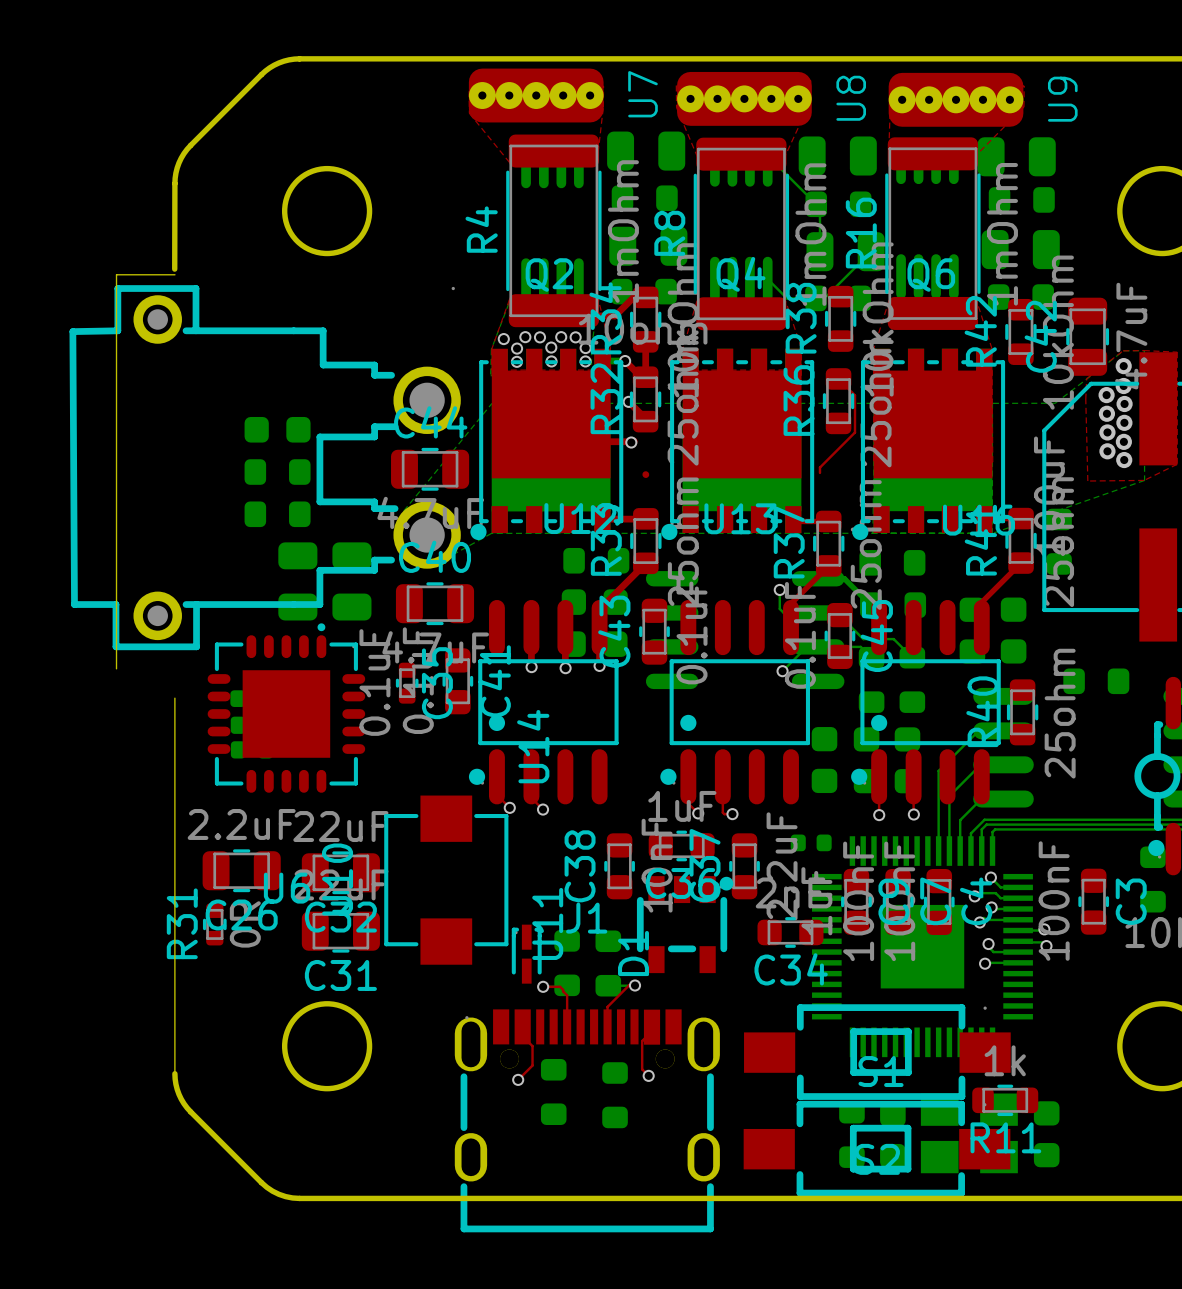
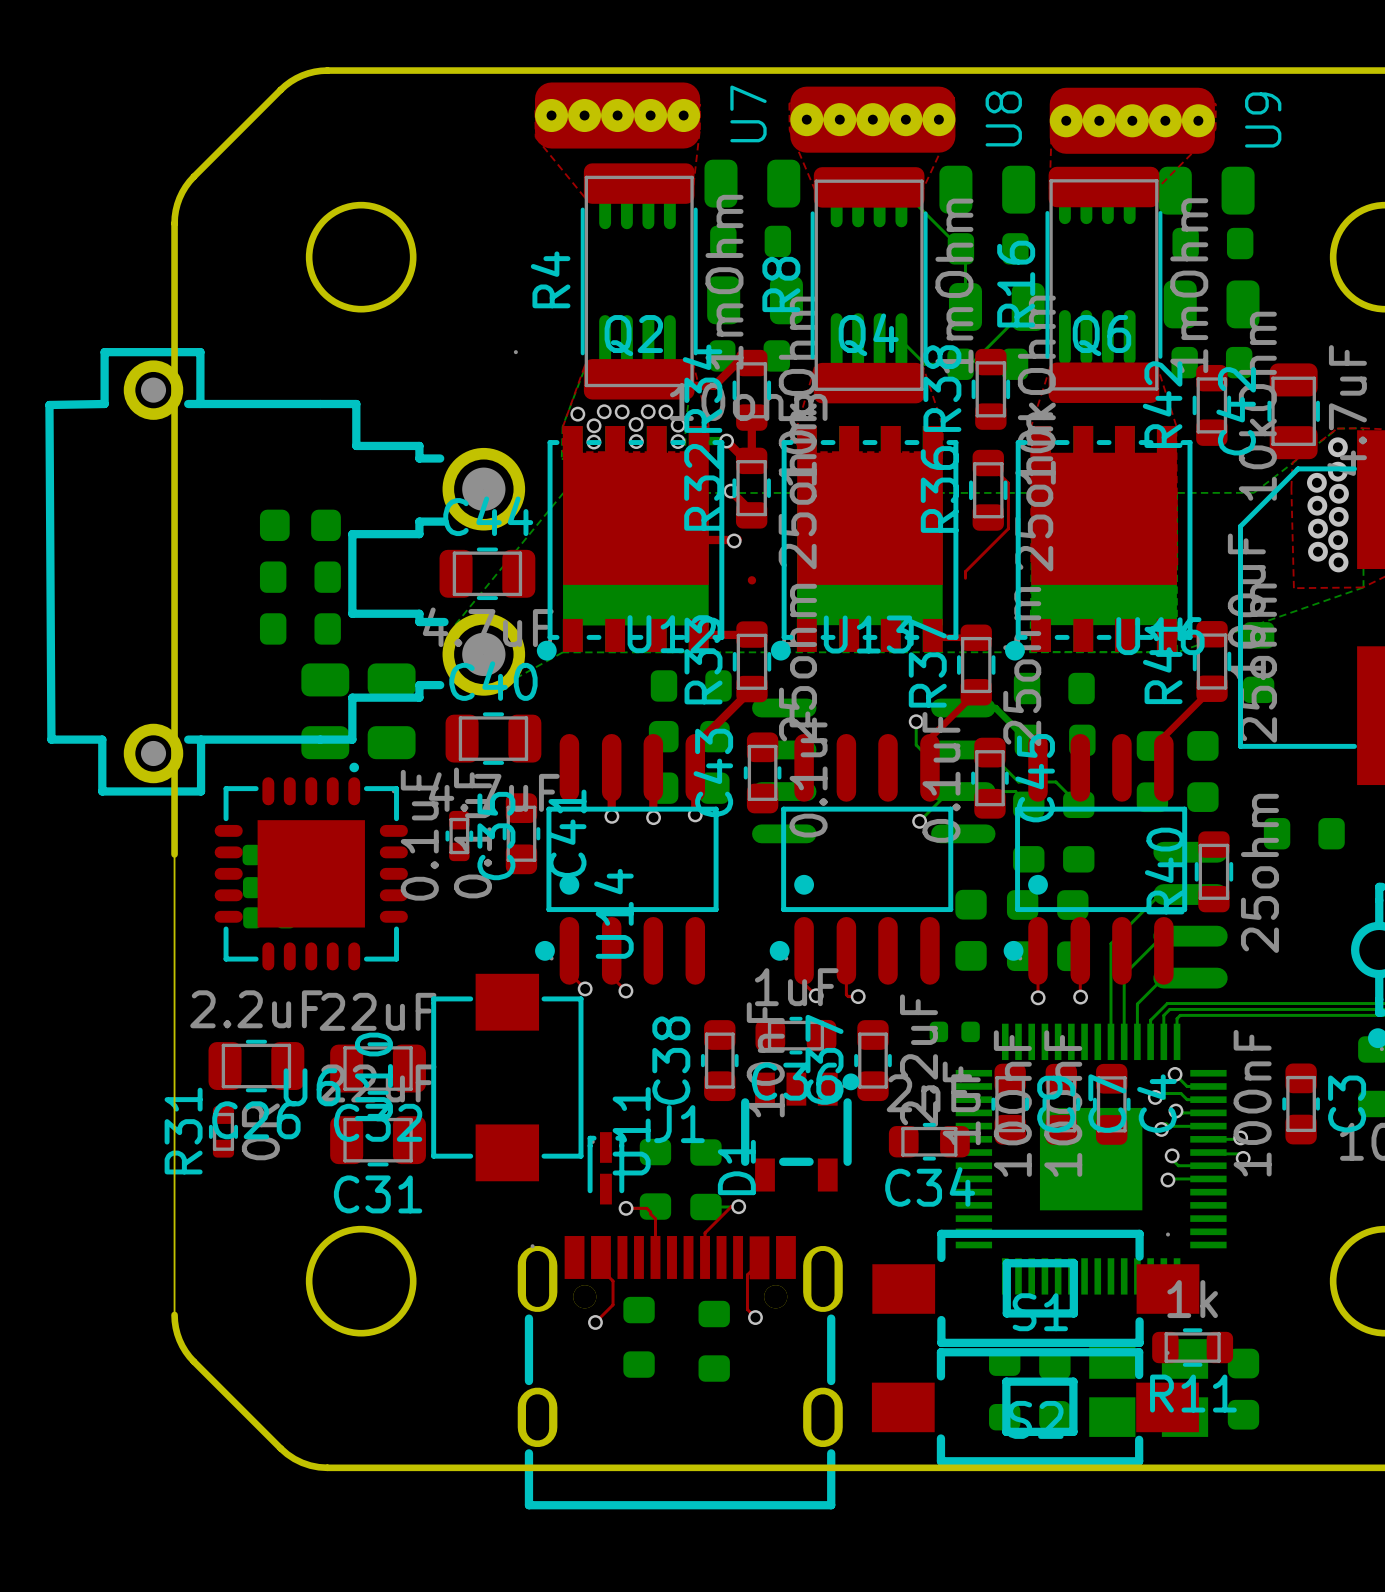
board edge: (174, 183) (174, 269) -> (174, 223) (174, 854)
board edge: (174, 274) (116, 274) (116, 668) -> none

